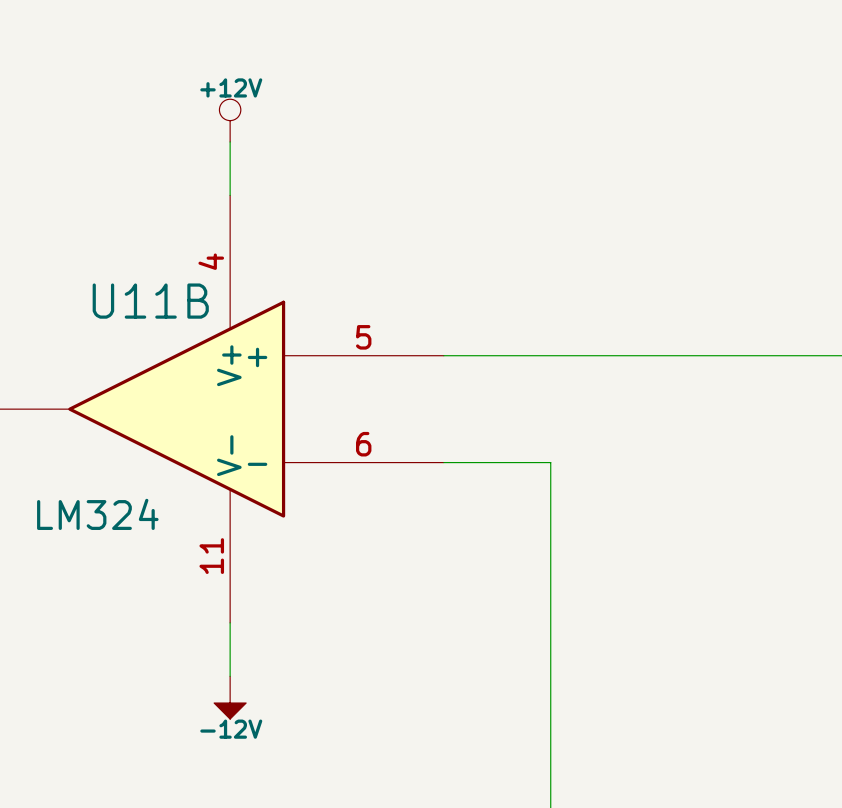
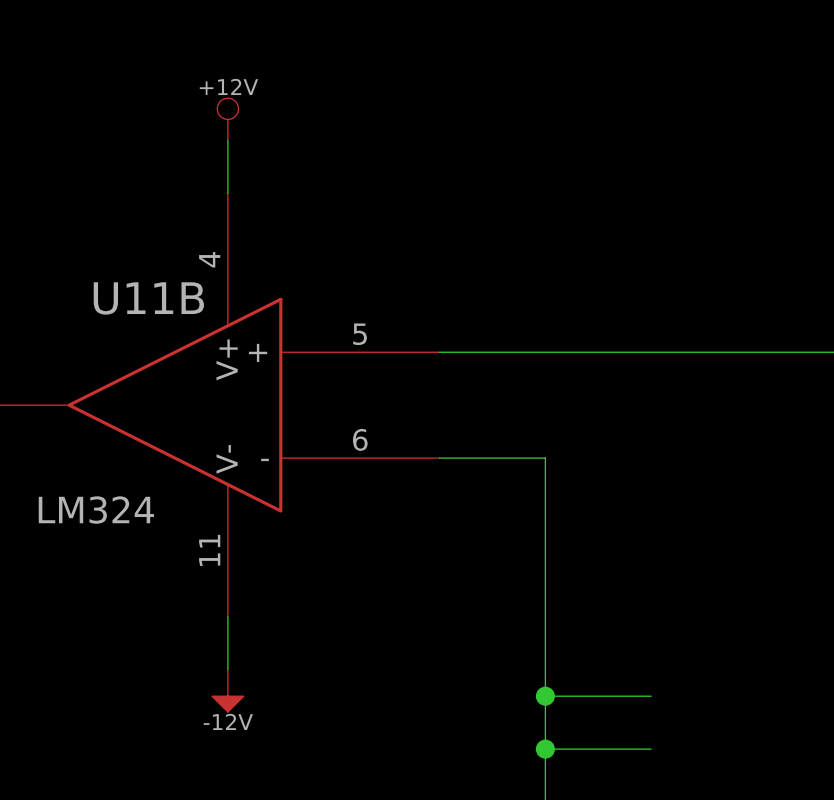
wire: none -> (545, 696) (651, 696)
junction: none -> (545, 696)
wire: none -> (545, 749) (651, 749)
junction: none -> (545, 749)

